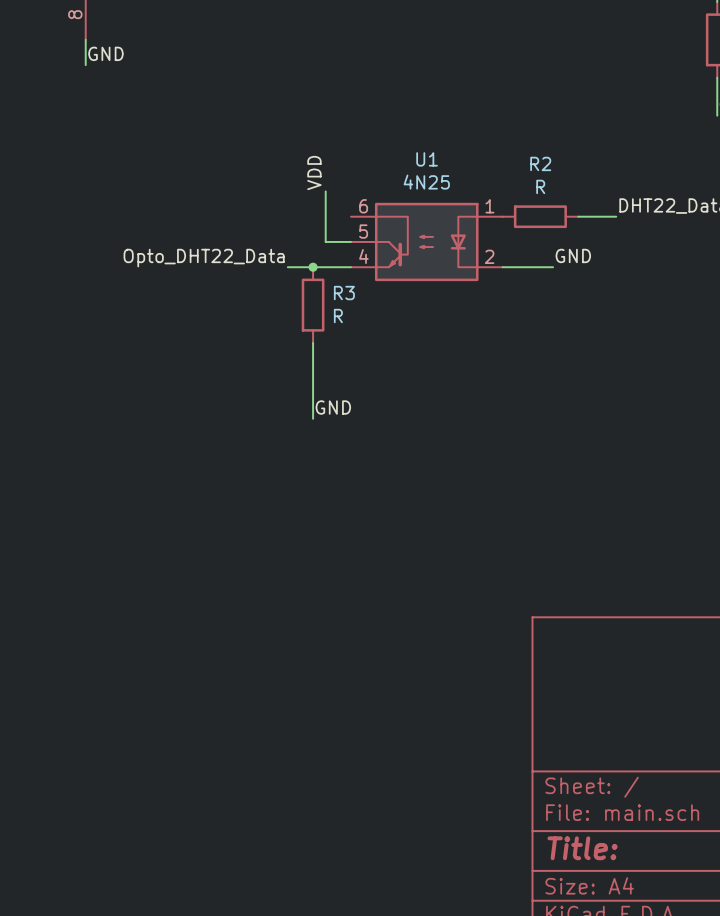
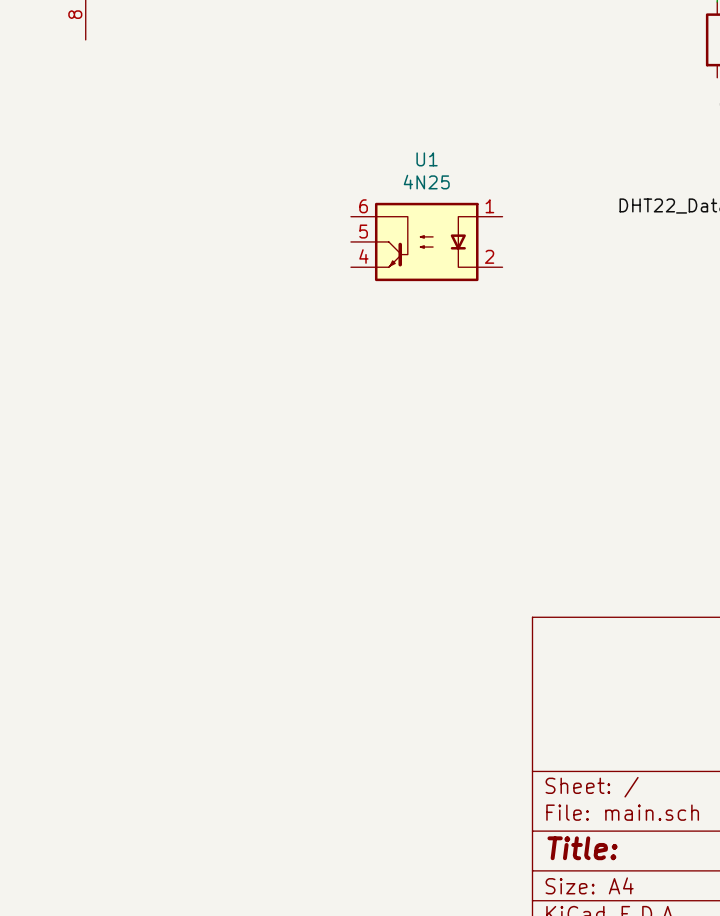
wire: (85, 39) (85, 65) -> none
label: GND (105, 53) -> none
wire: (717, 77) (717, 115) -> none
label: VDD (314, 173) -> none
wire: (325, 191) (325, 241) (350, 241) -> none
R2: R (540, 216) -> none
wire: (578, 216) (616, 216) -> none
label: GND (573, 255) -> none
label: Opto_DHT22_Data (204, 258) -> none
wire: (287, 267) (350, 267) -> none
junction: (313, 267) -> none
wire: (502, 267) (553, 267) -> none
R3: R (313, 305) -> none
wire: (313, 343) (313, 418) -> none
label: GND (333, 407) -> none

